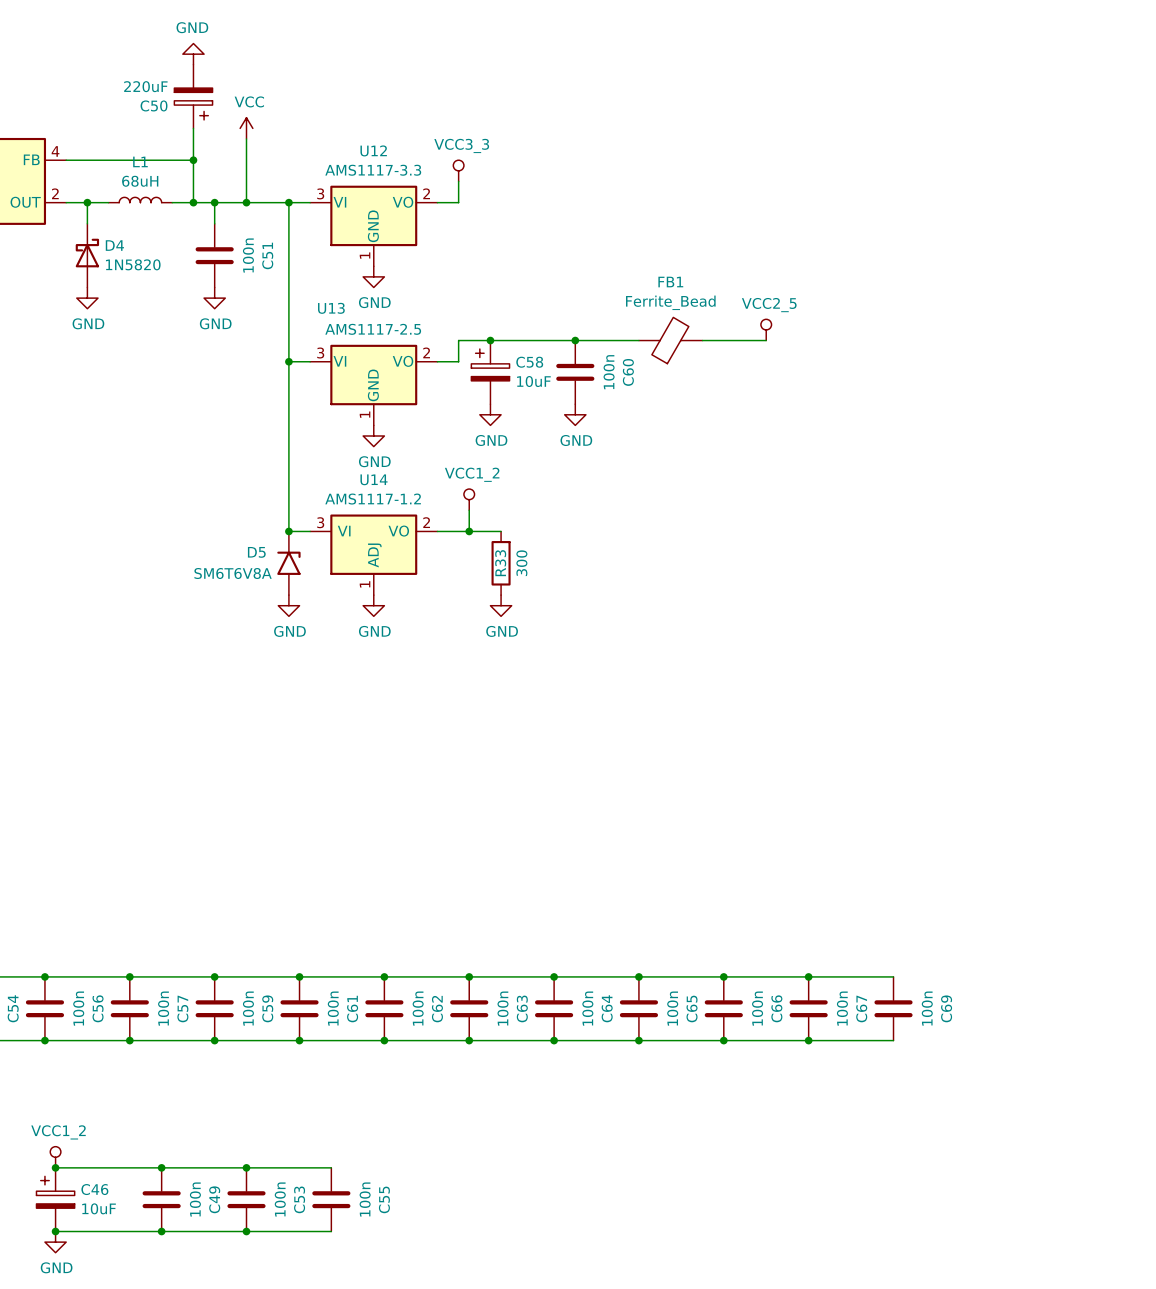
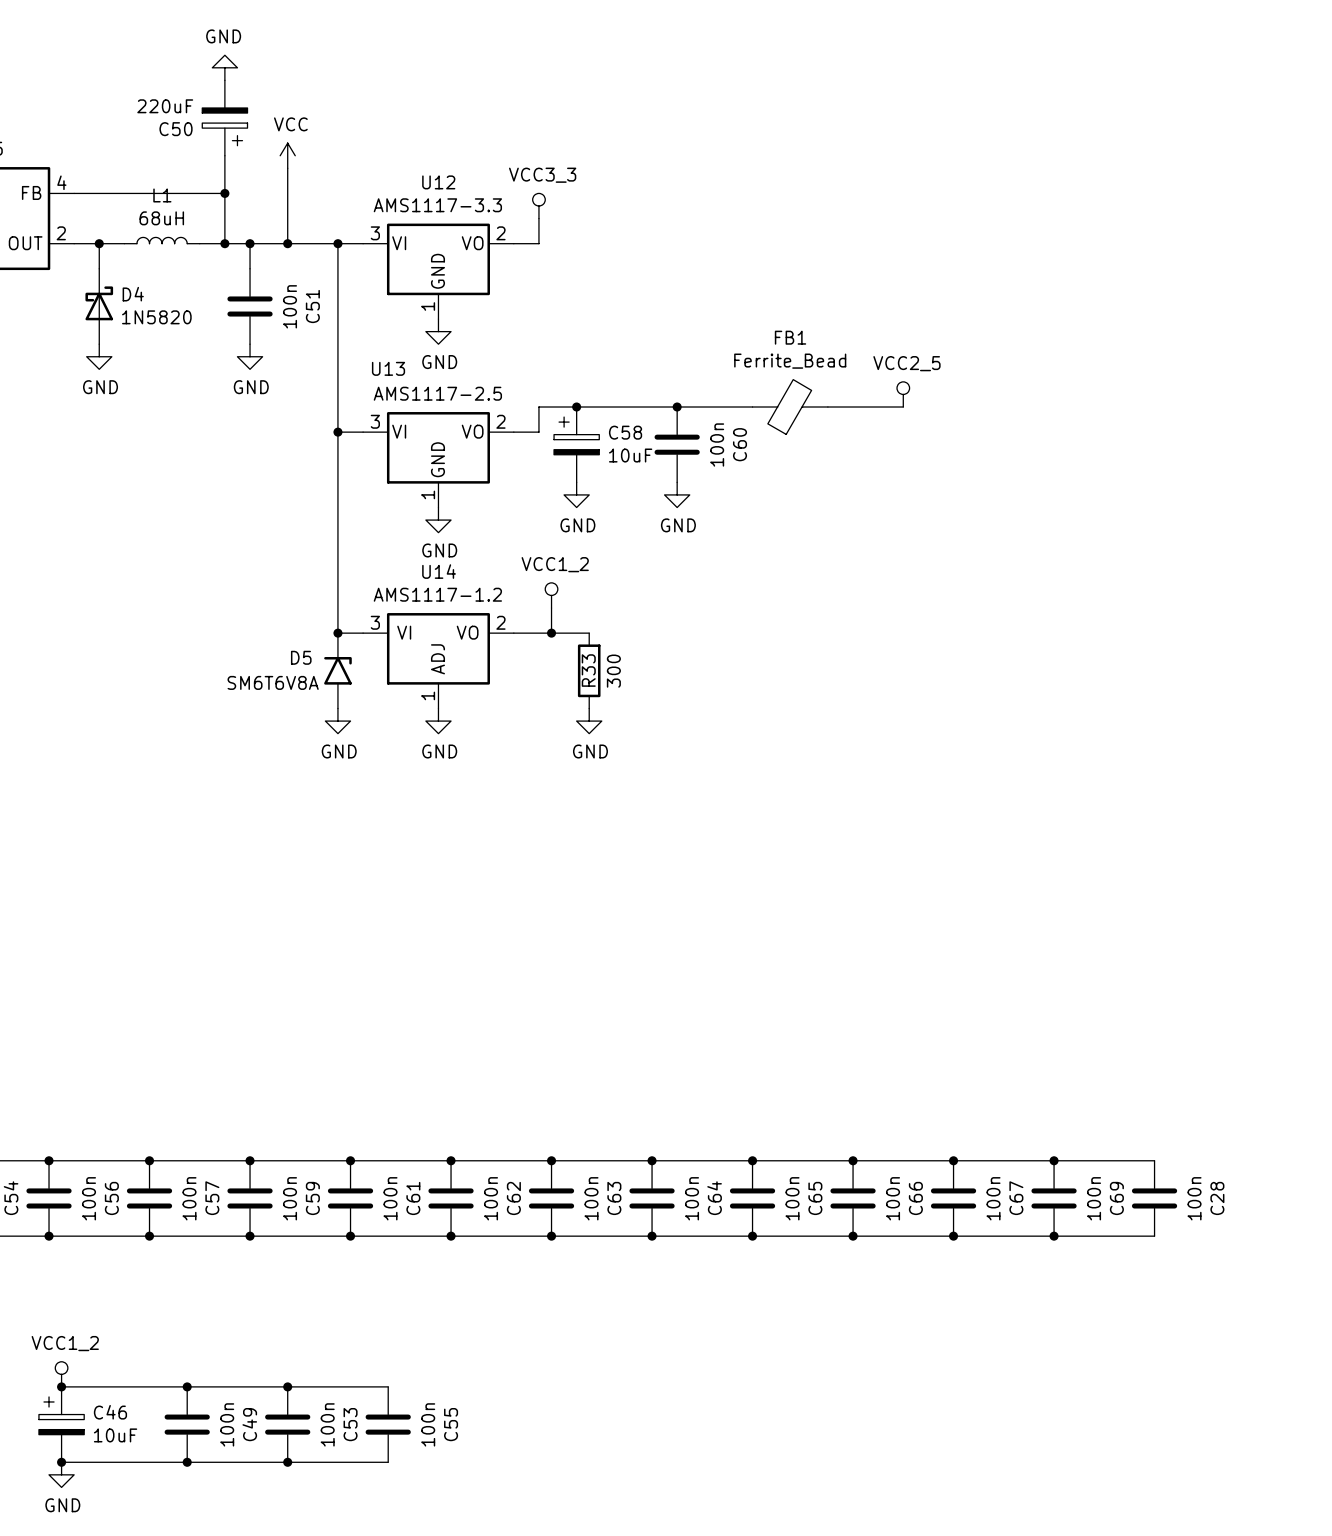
wire: none -> (1054, 1160) (1154, 1160)
junction: none -> (1054, 1160)
C28: none -> 100n (1154, 1198)
wire: none -> (1054, 1236) (1154, 1236)
junction: none -> (1054, 1236)

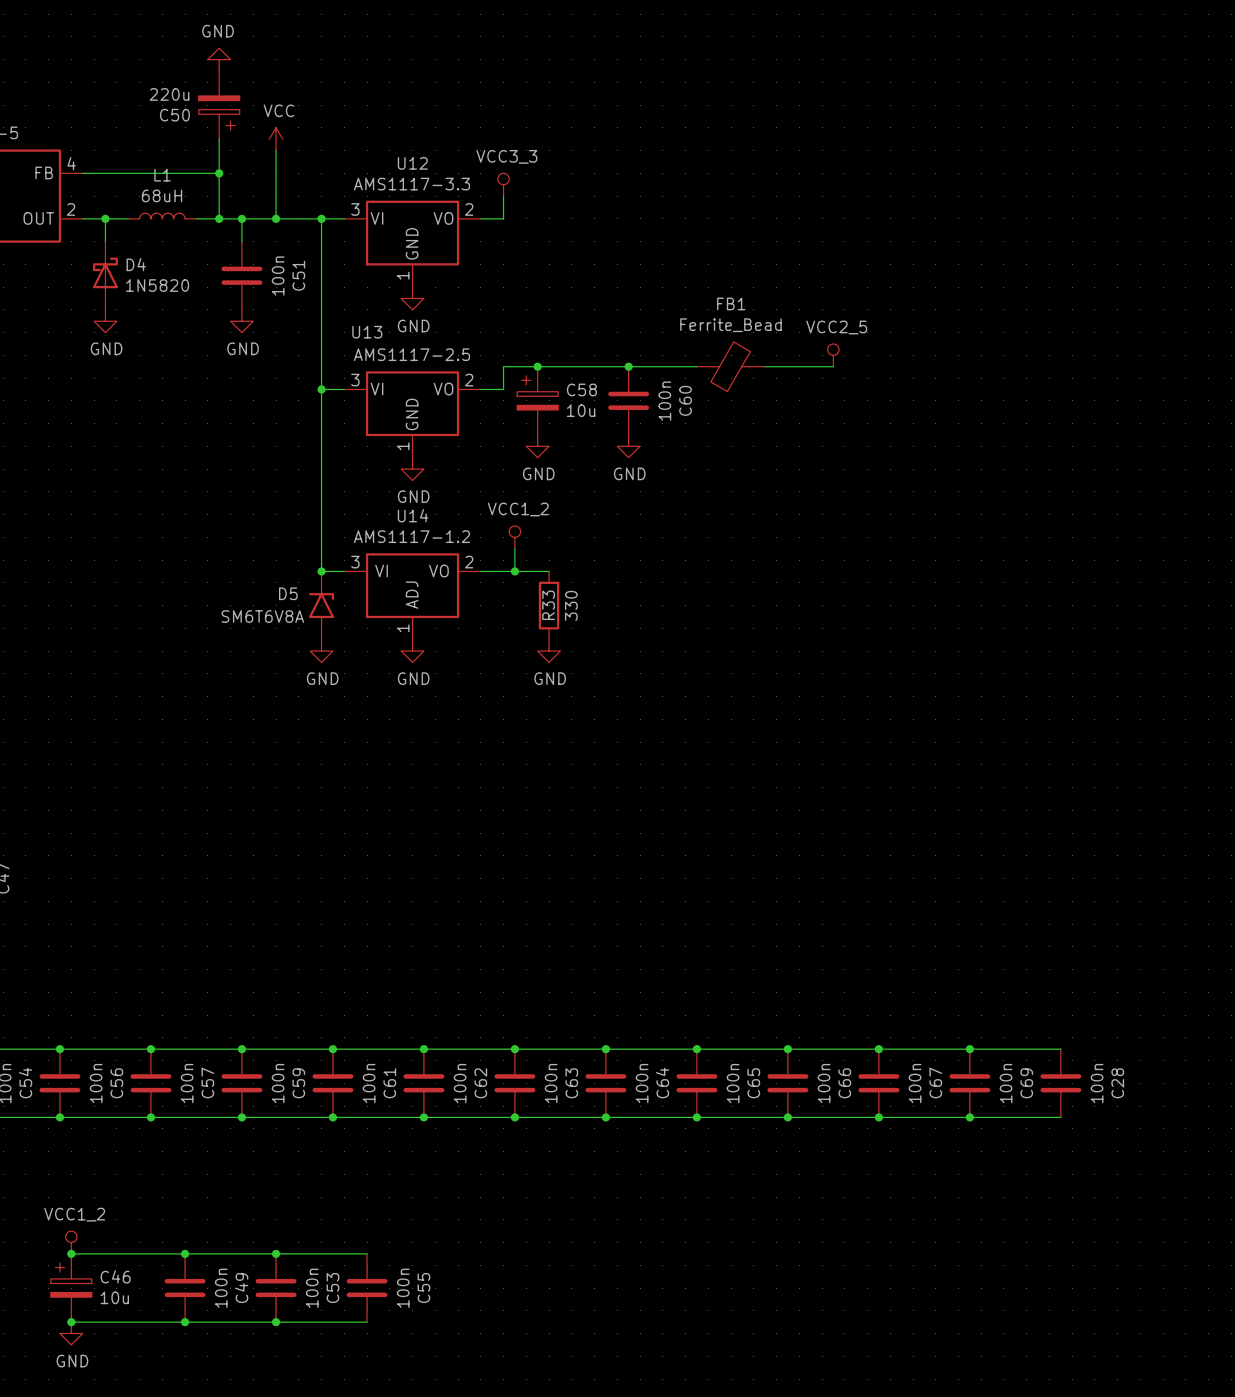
C50 value: 220uF (165, 106) -> 220u (169, 94)
C58 value: 10uF (630, 455) -> 10u (581, 410)
R33 value: 300 (613, 671) -> 330 (571, 605)
C46 value: 10uF (115, 1435) -> 10u (114, 1297)

